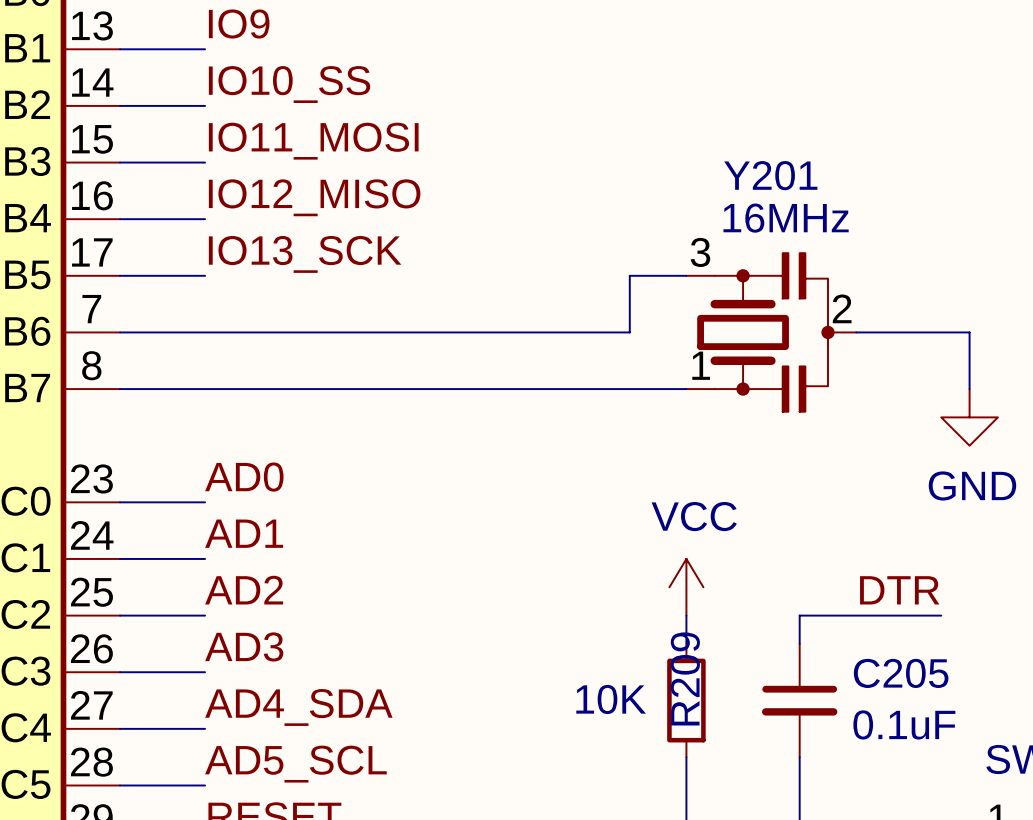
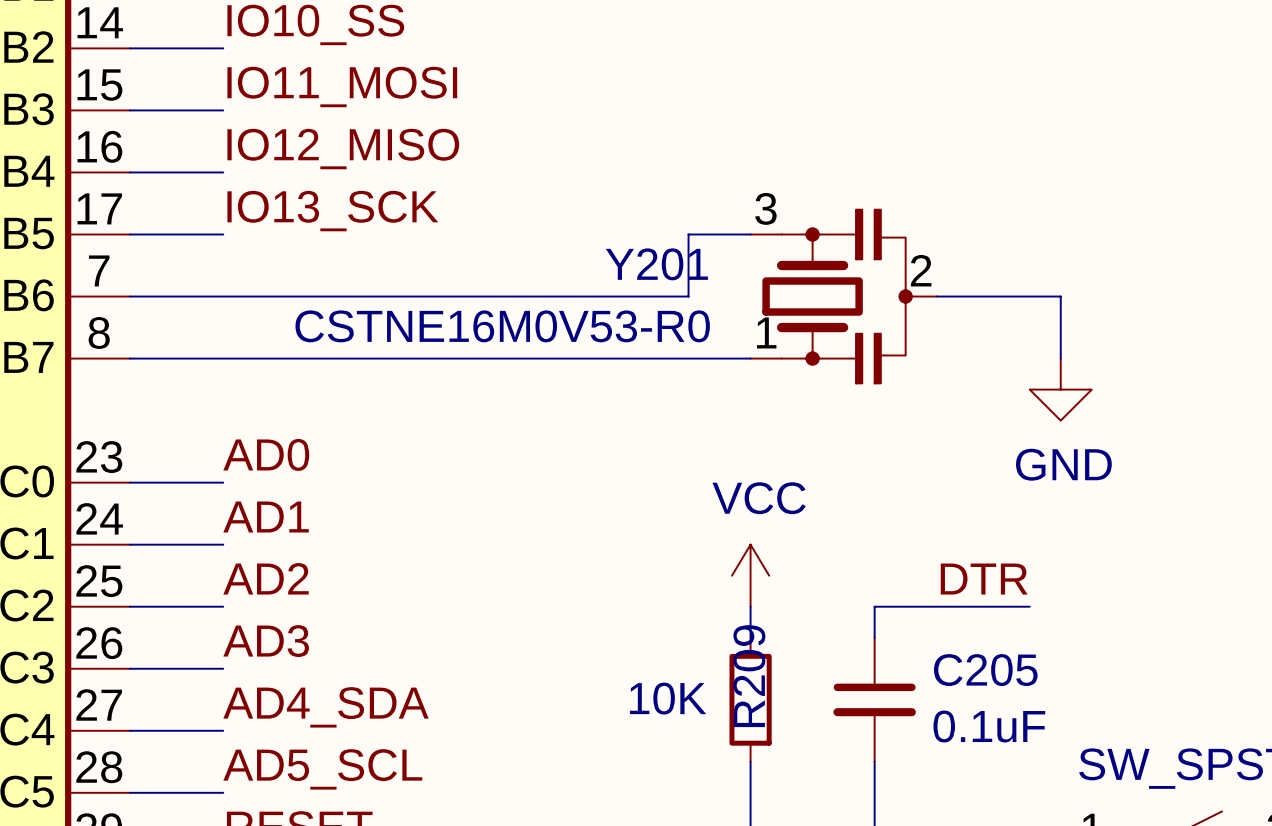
Y201 name position: Y201 (770, 175) -> Y201 (656, 264)
Y201 value: 16MHz (786, 218) -> CSTNE16M0V53-R0 (502, 326)

